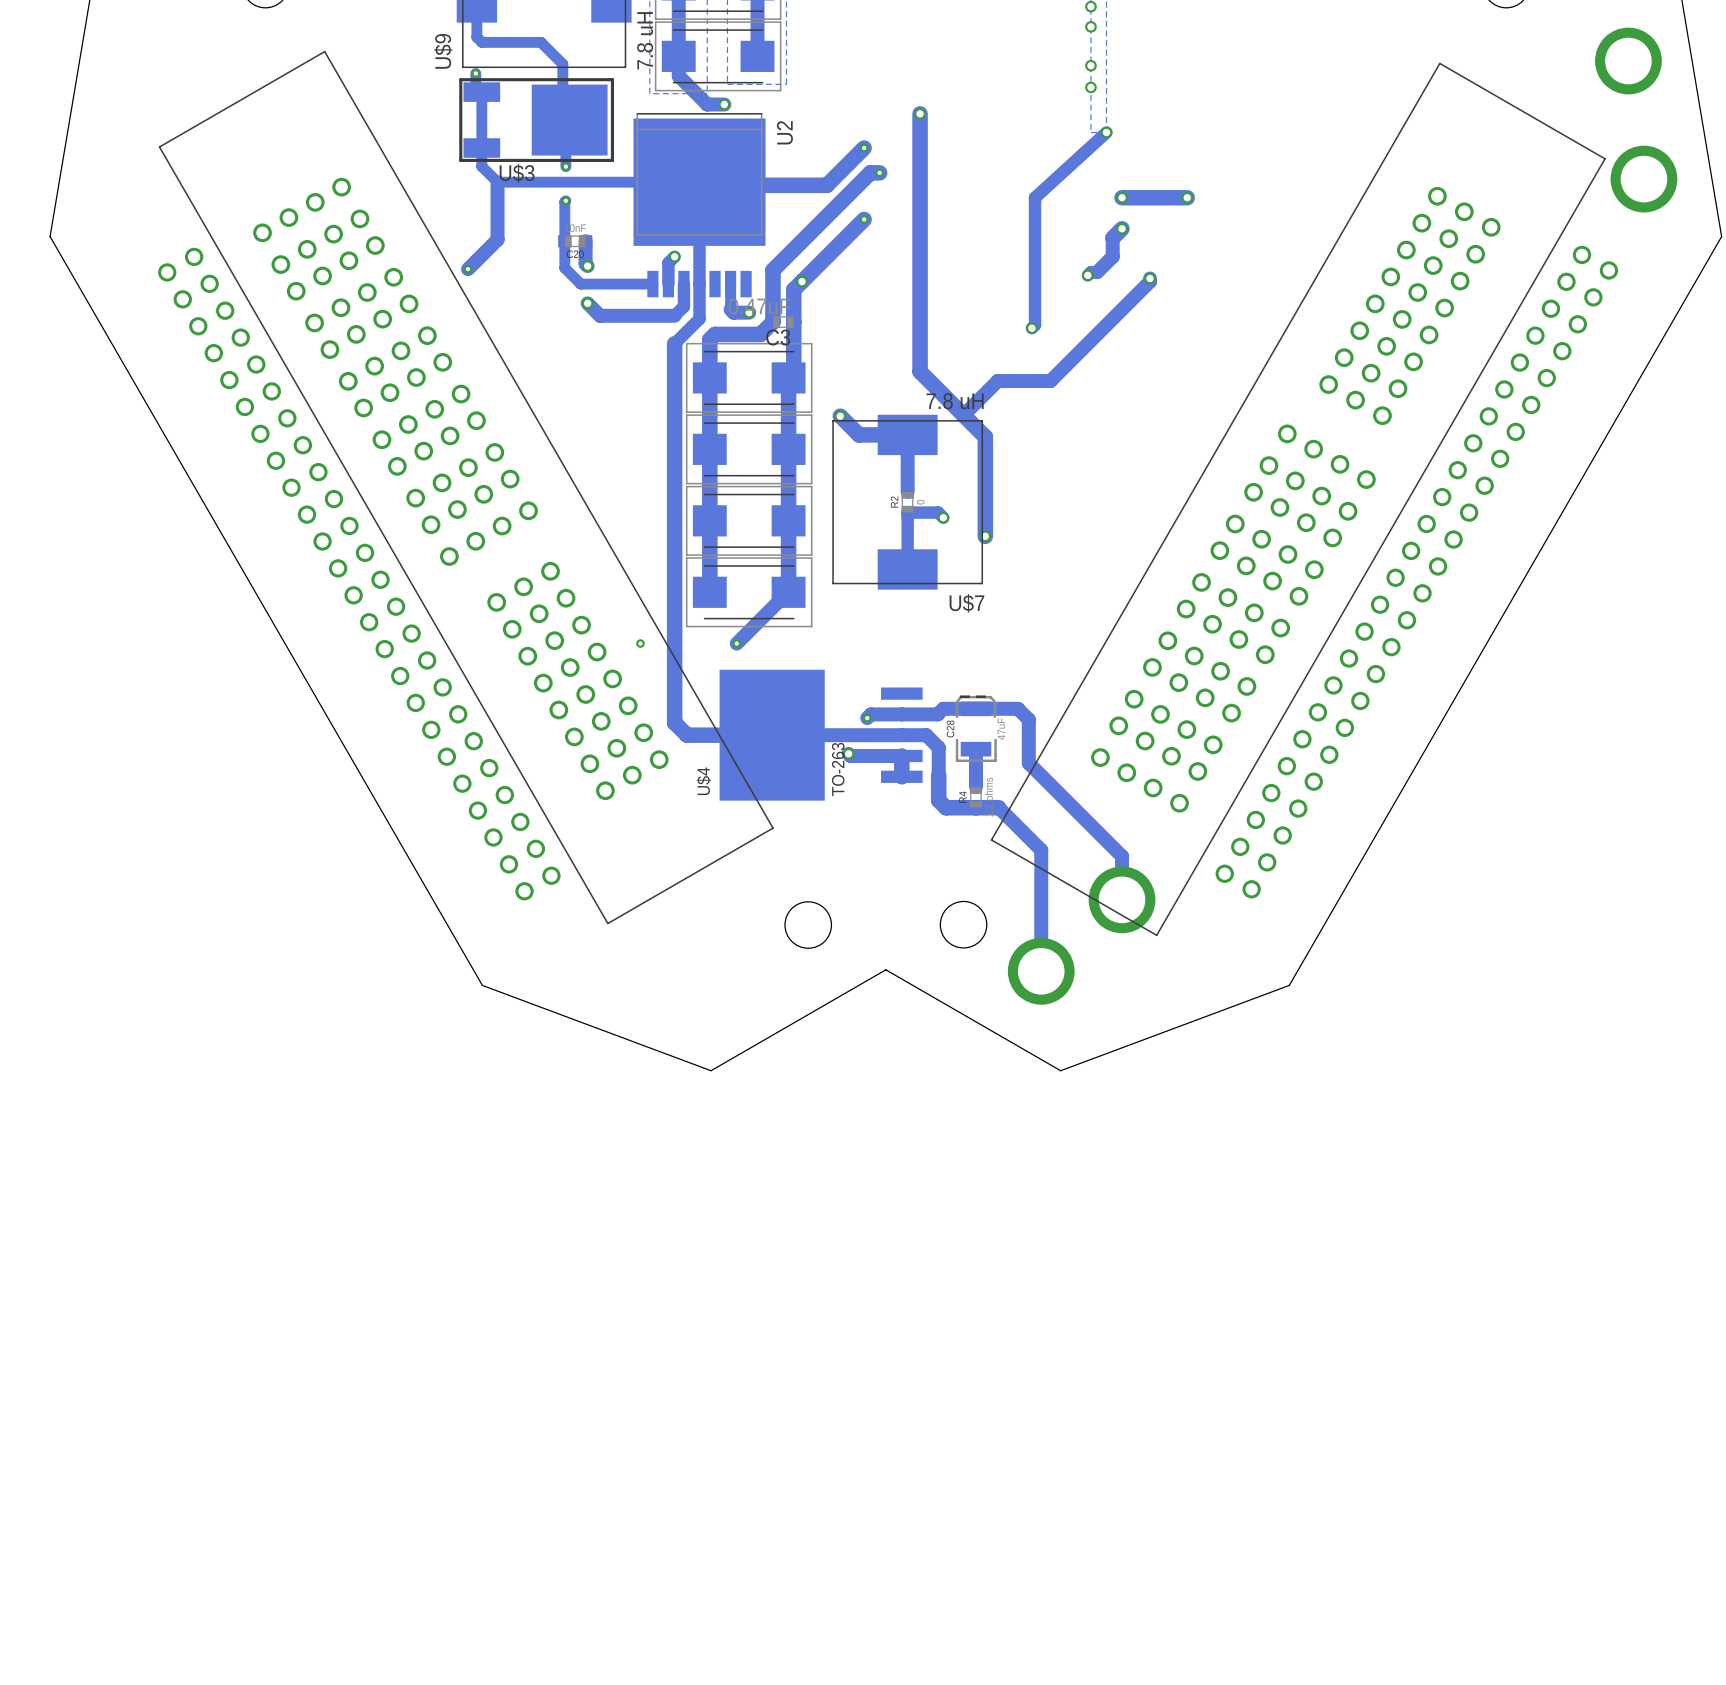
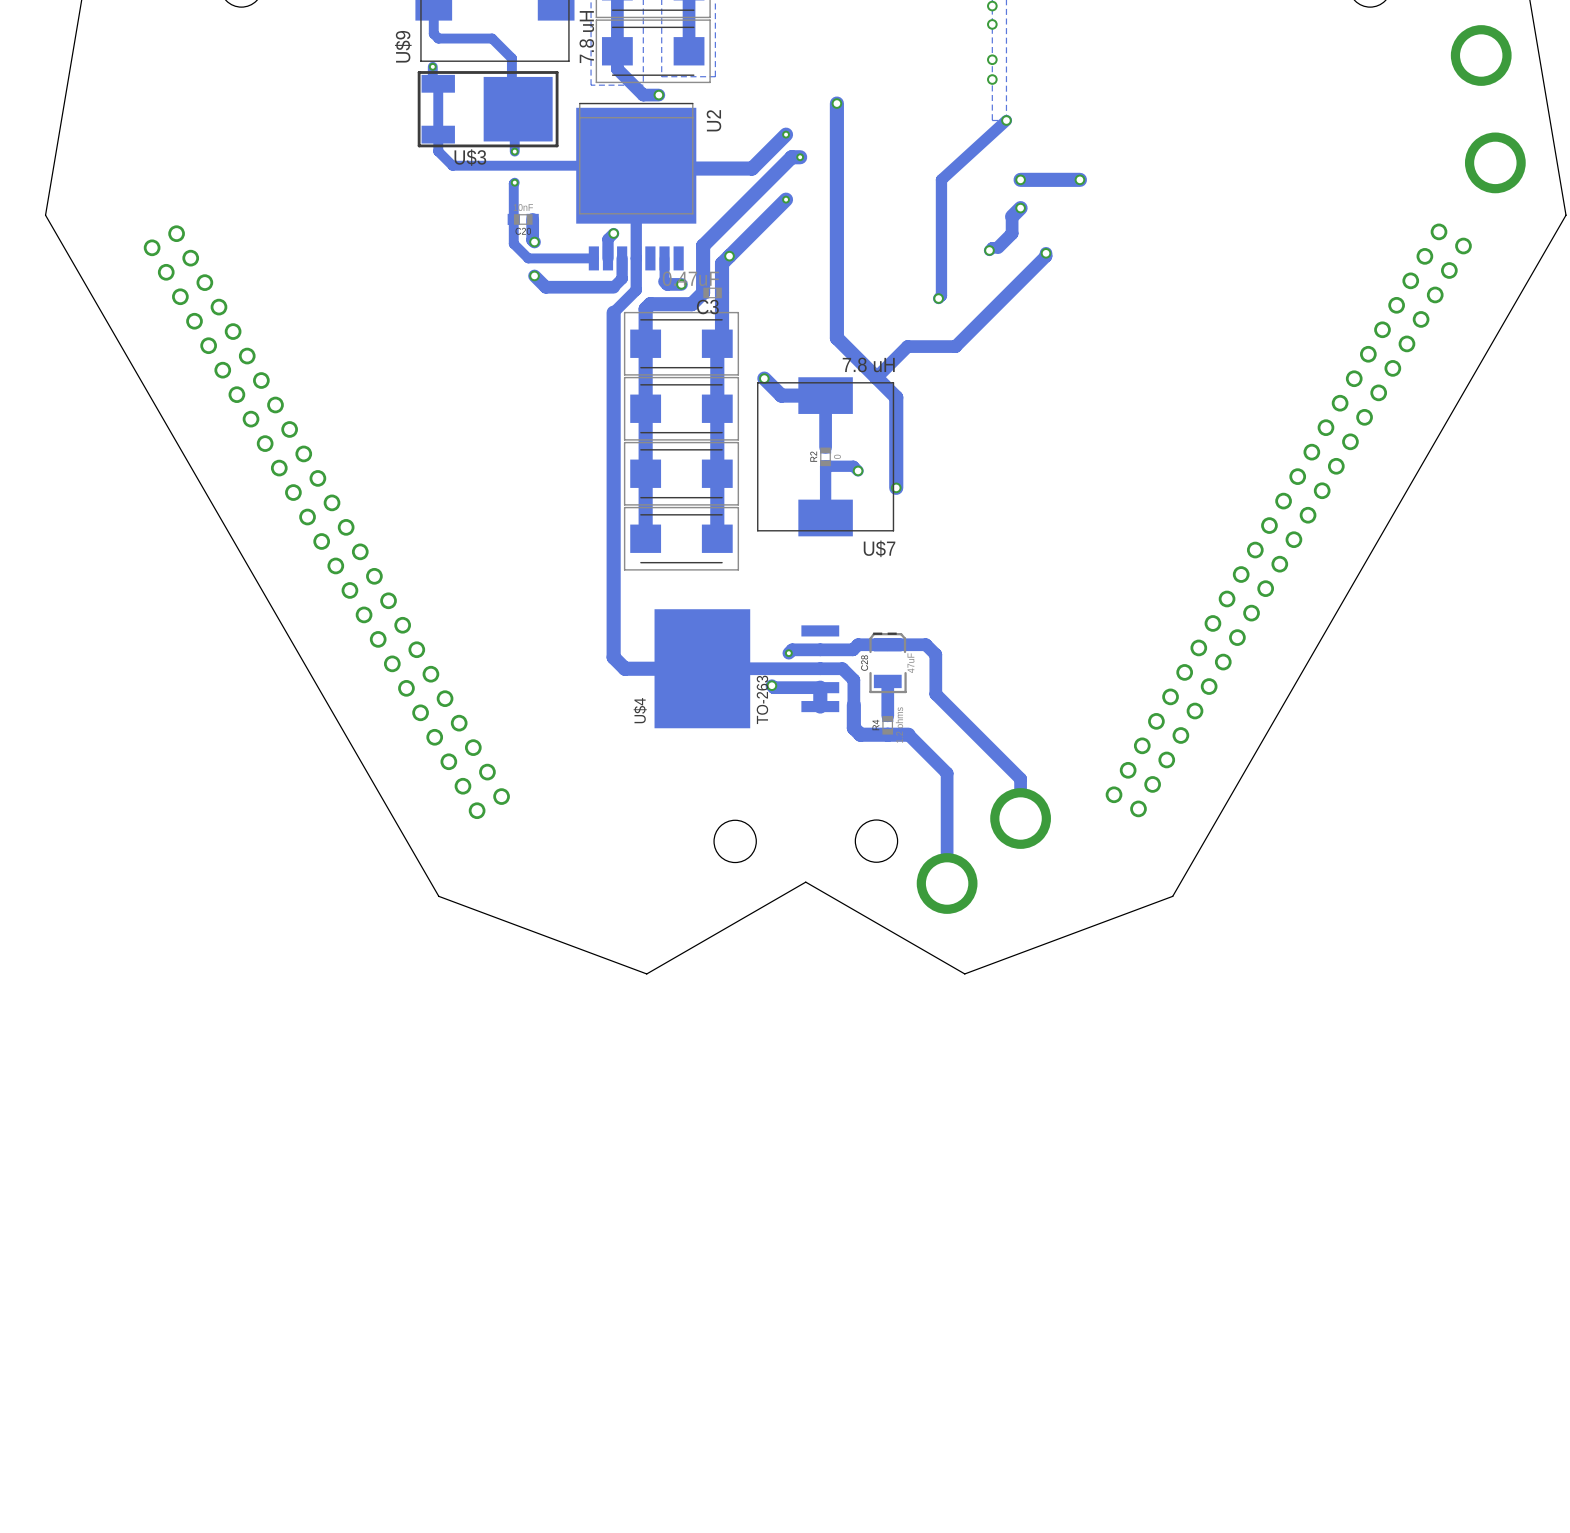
track: (497, 182) (497, 239) (468, 269) -> none
via: (468, 269) -> none
part: (466, 487) -> none
part: (1298, 499) -> none
track: (788, 592) (736, 643) -> none
via: (640, 643) -> none
via: (736, 643) -> none

